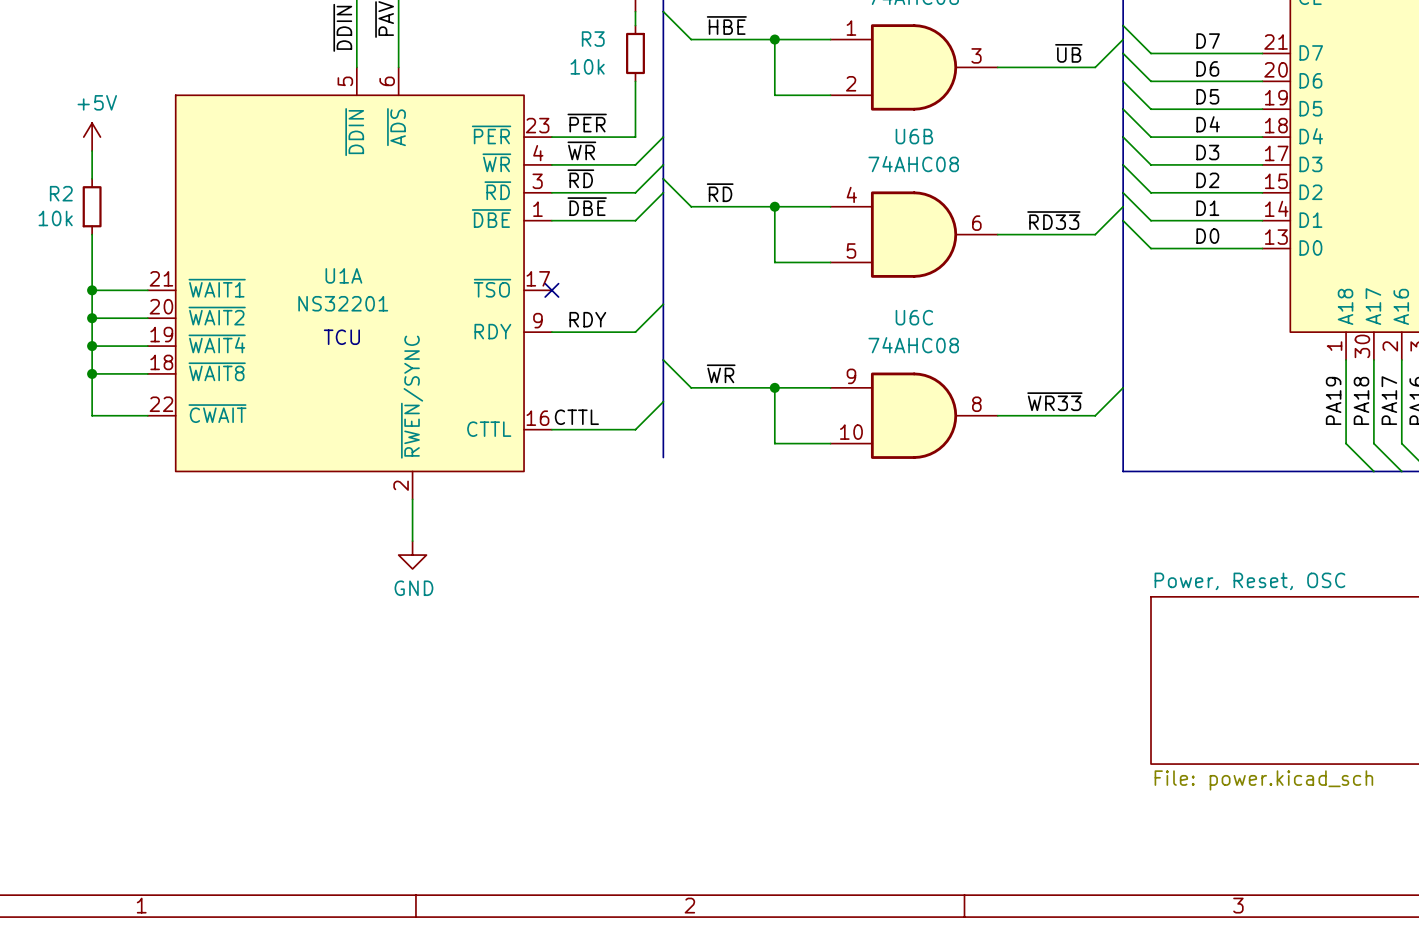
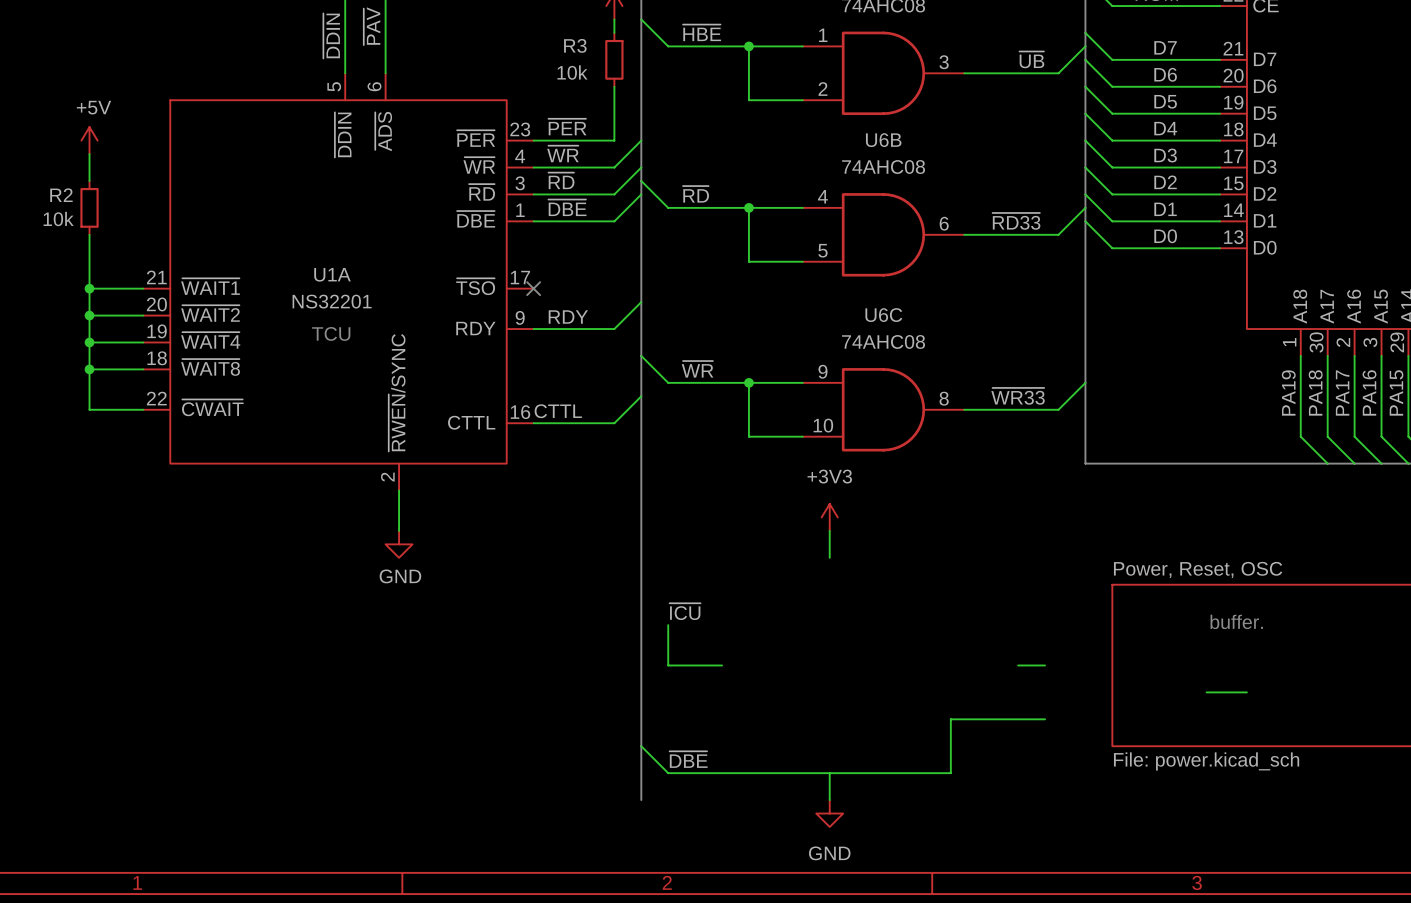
bus: none -> (641, 450) (641, 800)
power symbol: none -> +3V3 (829, 517)
wire: none -> (829, 530) (829, 557)
label: none -> ~{ICU} (685, 611)
text: none -> buffer. (1236, 621)
wire: none -> (668, 625) (668, 665) (722, 665)
wire: none -> (1018, 665) (1045, 665)
wire: none -> (1206, 692) (1246, 692)
wire: none -> (1045, 719) (950, 719) (950, 773) (668, 773) (641, 746)
label: none -> ~{DBE} (688, 759)
wire: none -> (829, 773) (829, 800)
power symbol: none -> GND (829, 813)

